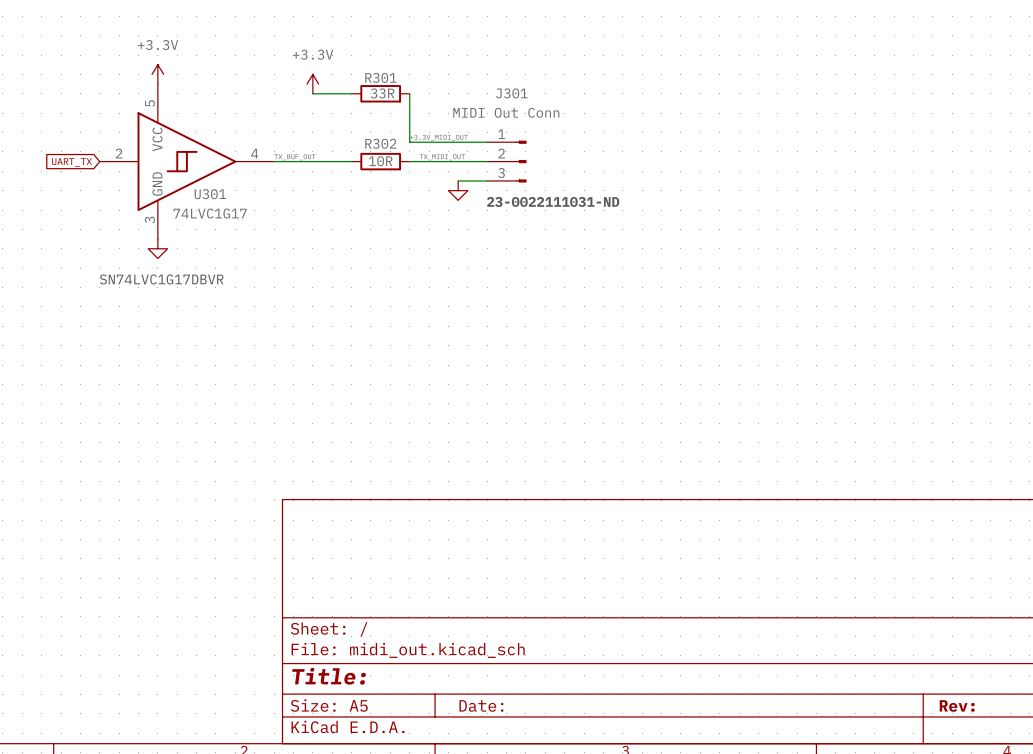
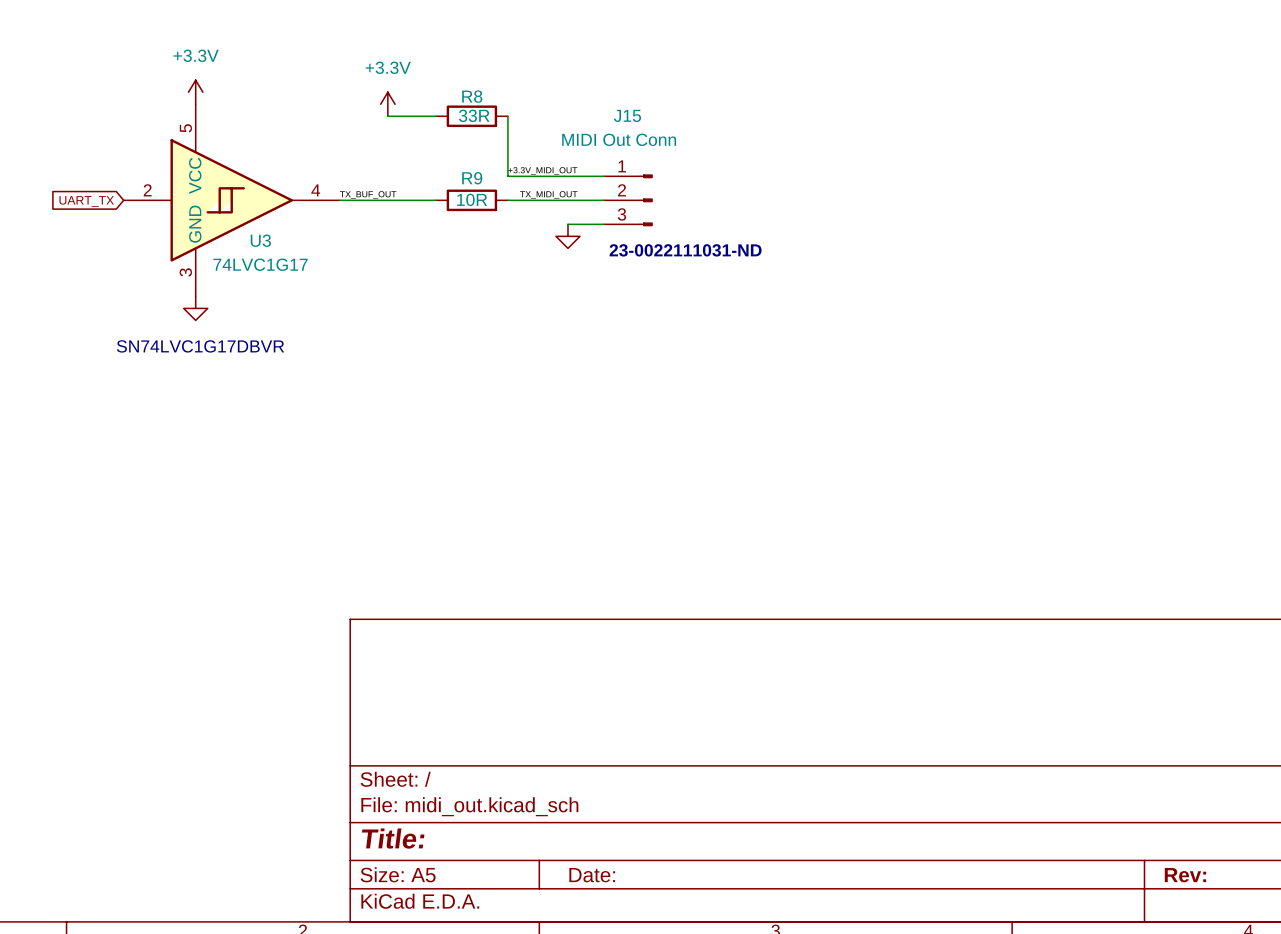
R301 name: R301 (380, 77) -> R8 (472, 96)
J301 name: J301 (511, 93) -> J15 (627, 115)
R302 name: R302 (380, 143) -> R9 (472, 178)
U301 name: U301 (210, 194) -> U3 (260, 240)

